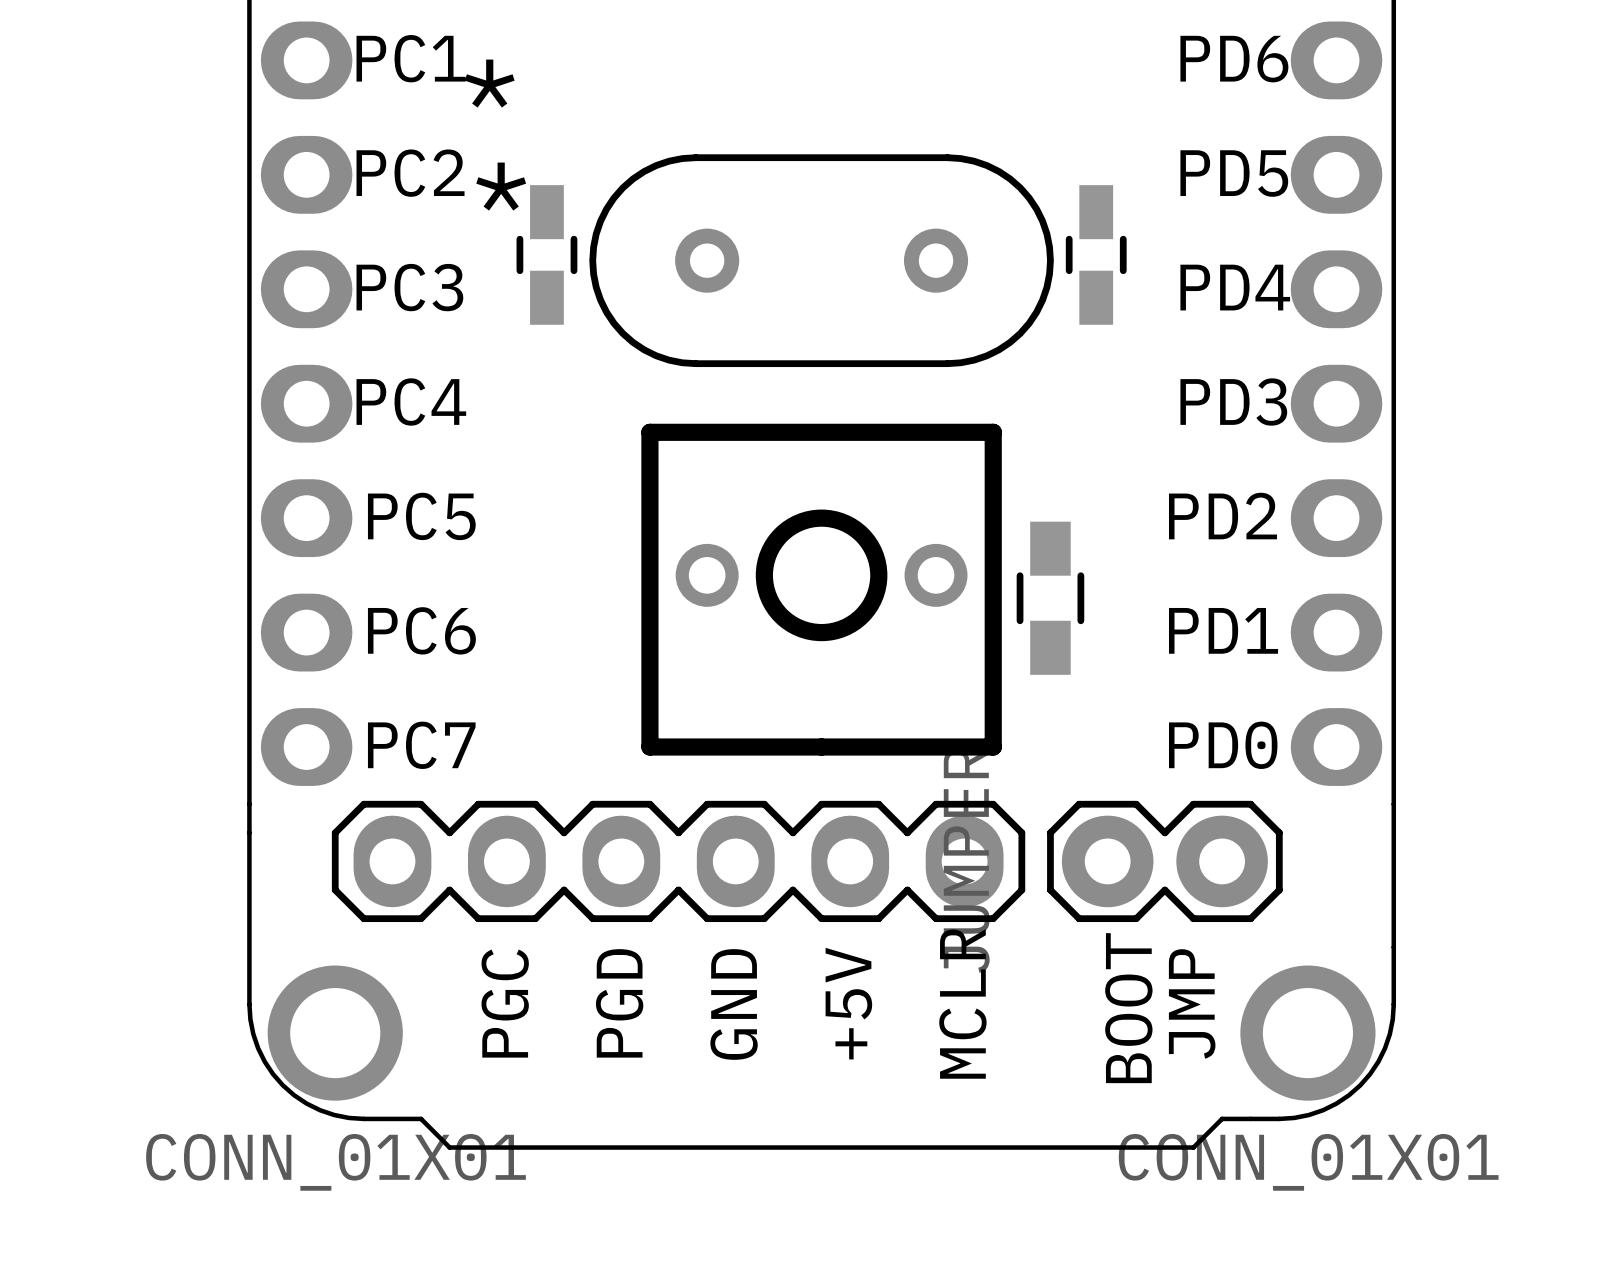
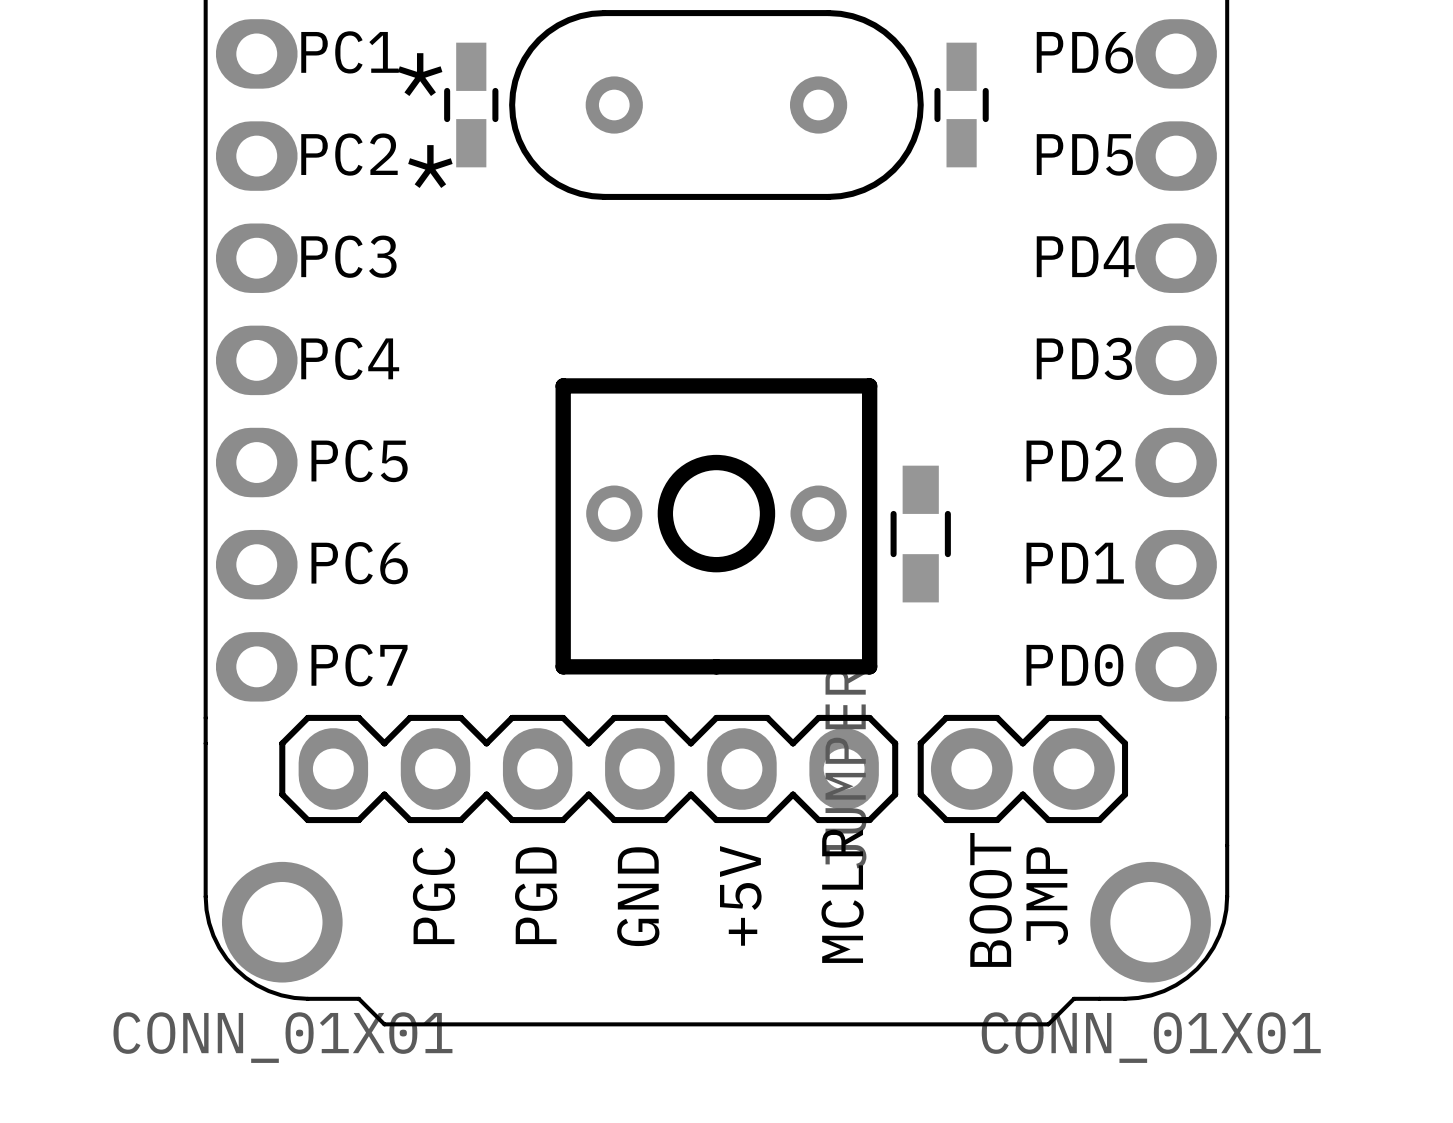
part position: (546, 254) -> (471, 105)
part position: (1096, 254) -> (961, 105)
part position: (821, 260) -> (716, 105)

